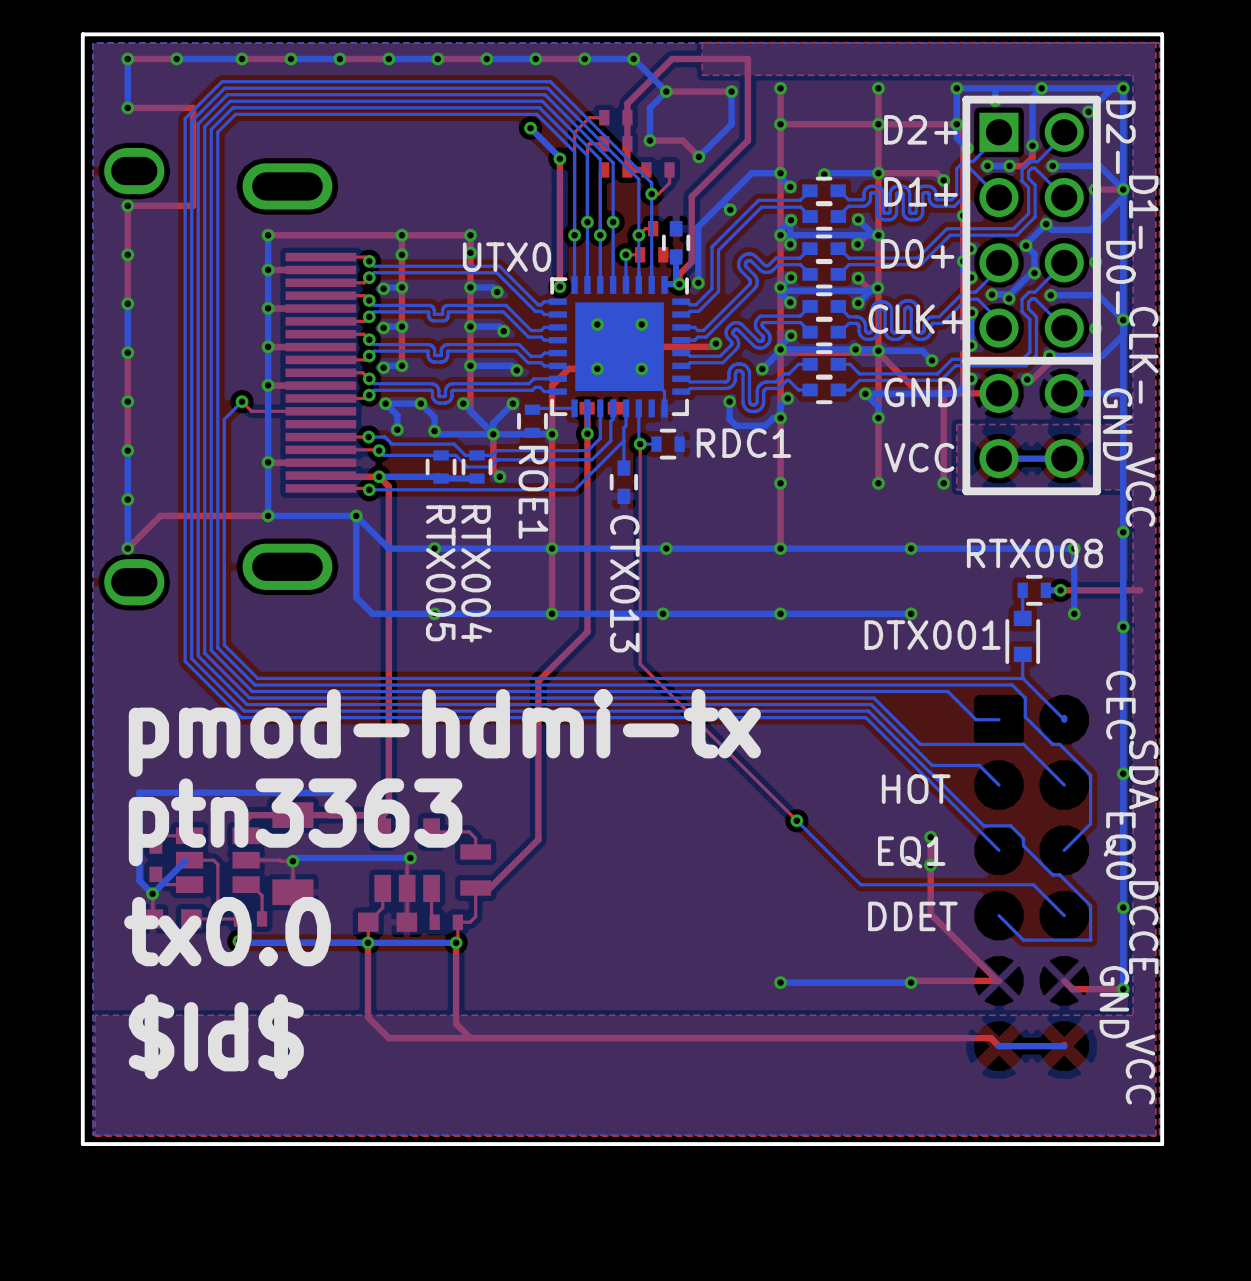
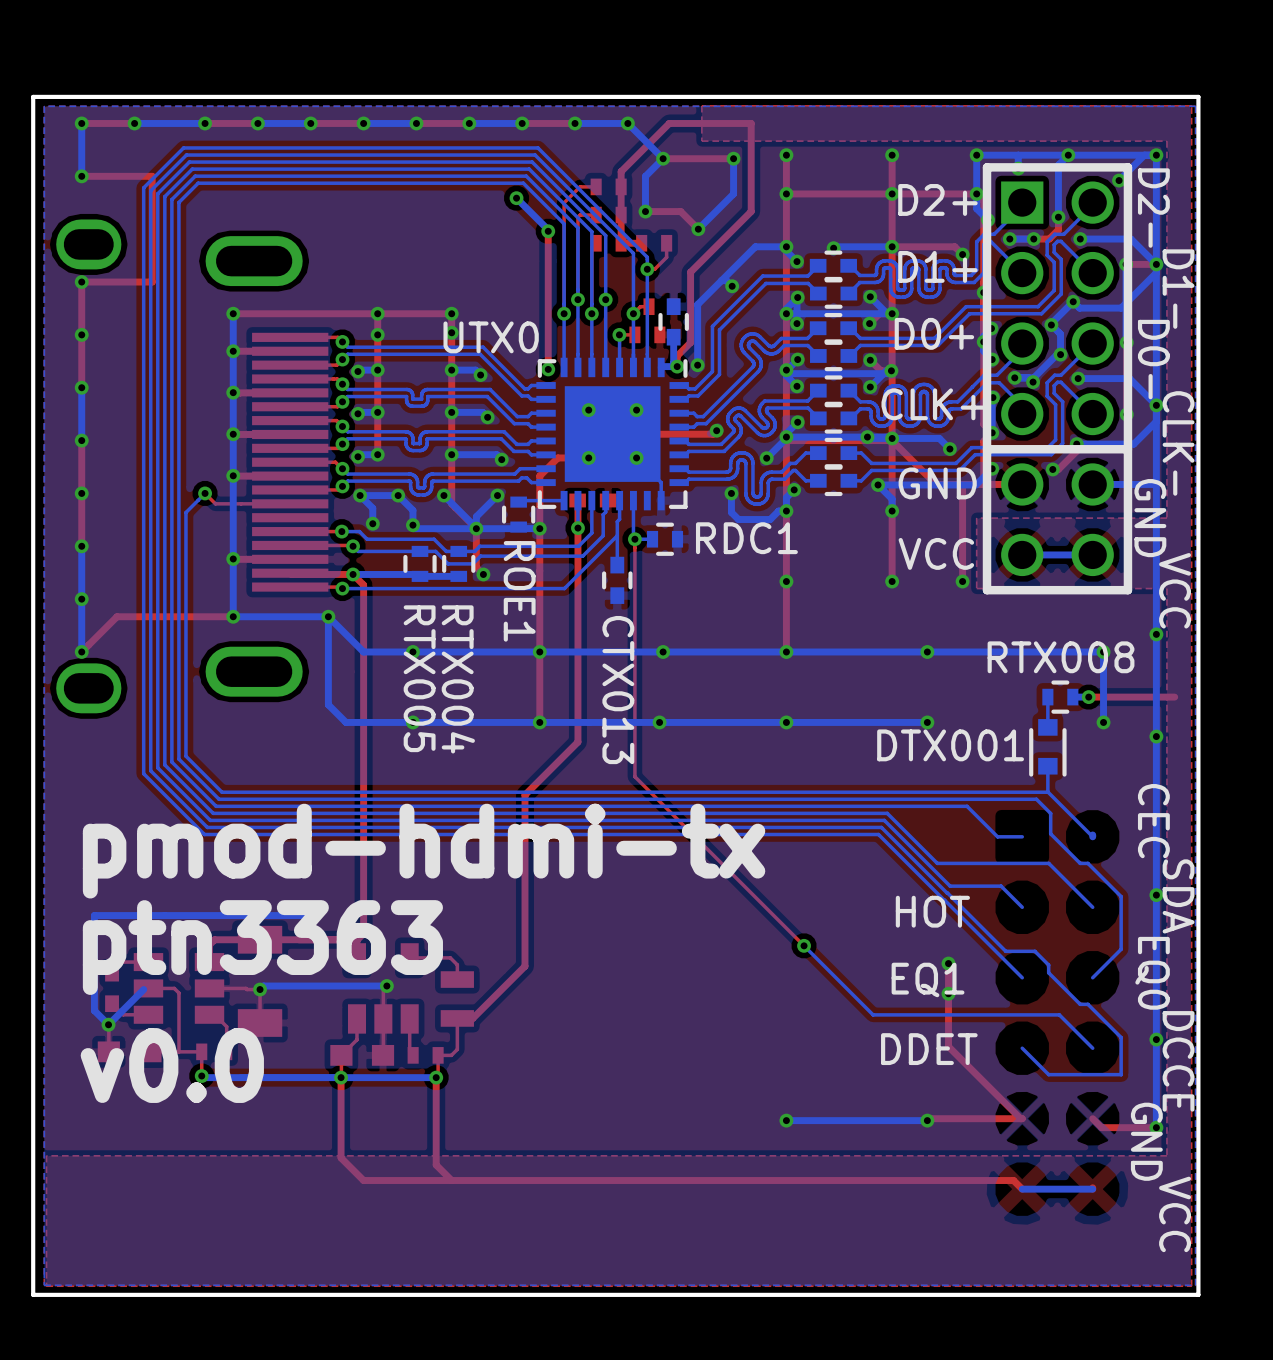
text: tx0.0 (227, 931) -> v0.0 (172, 1065)
text: $Id$ (216, 1036) -> none

